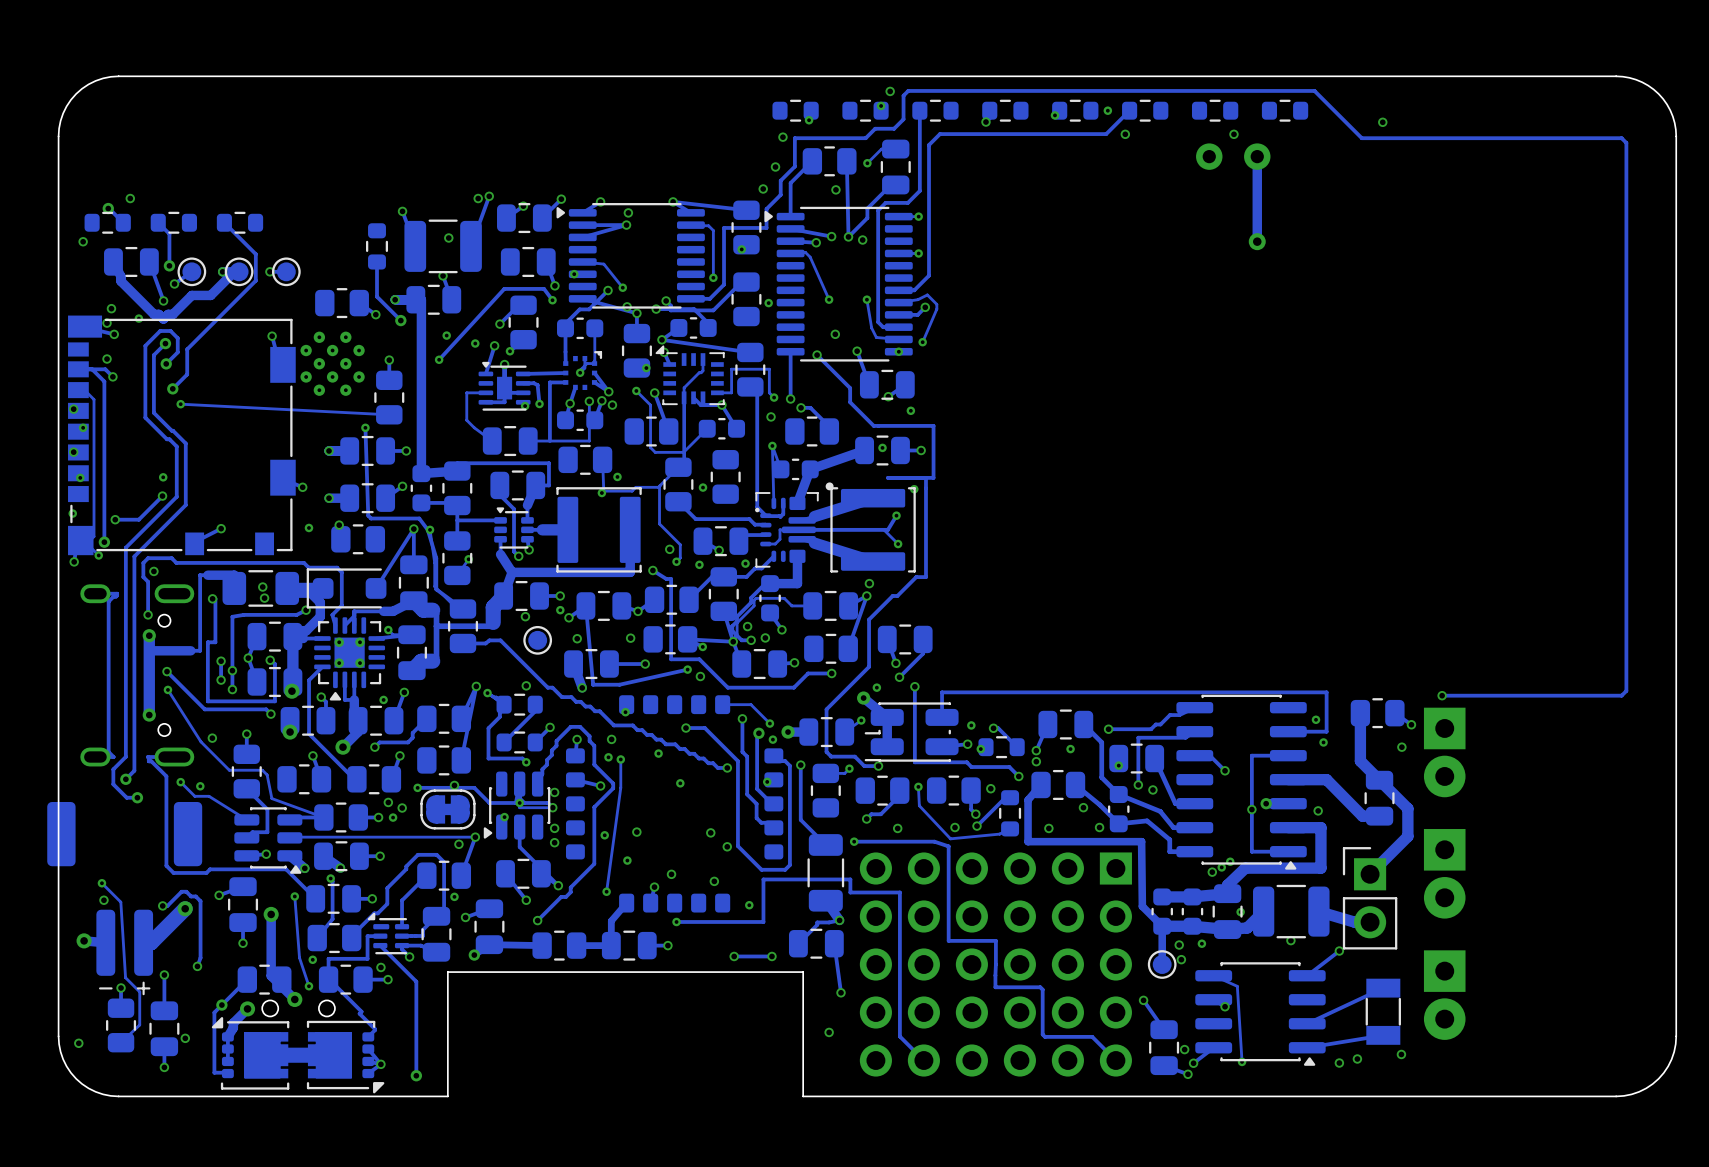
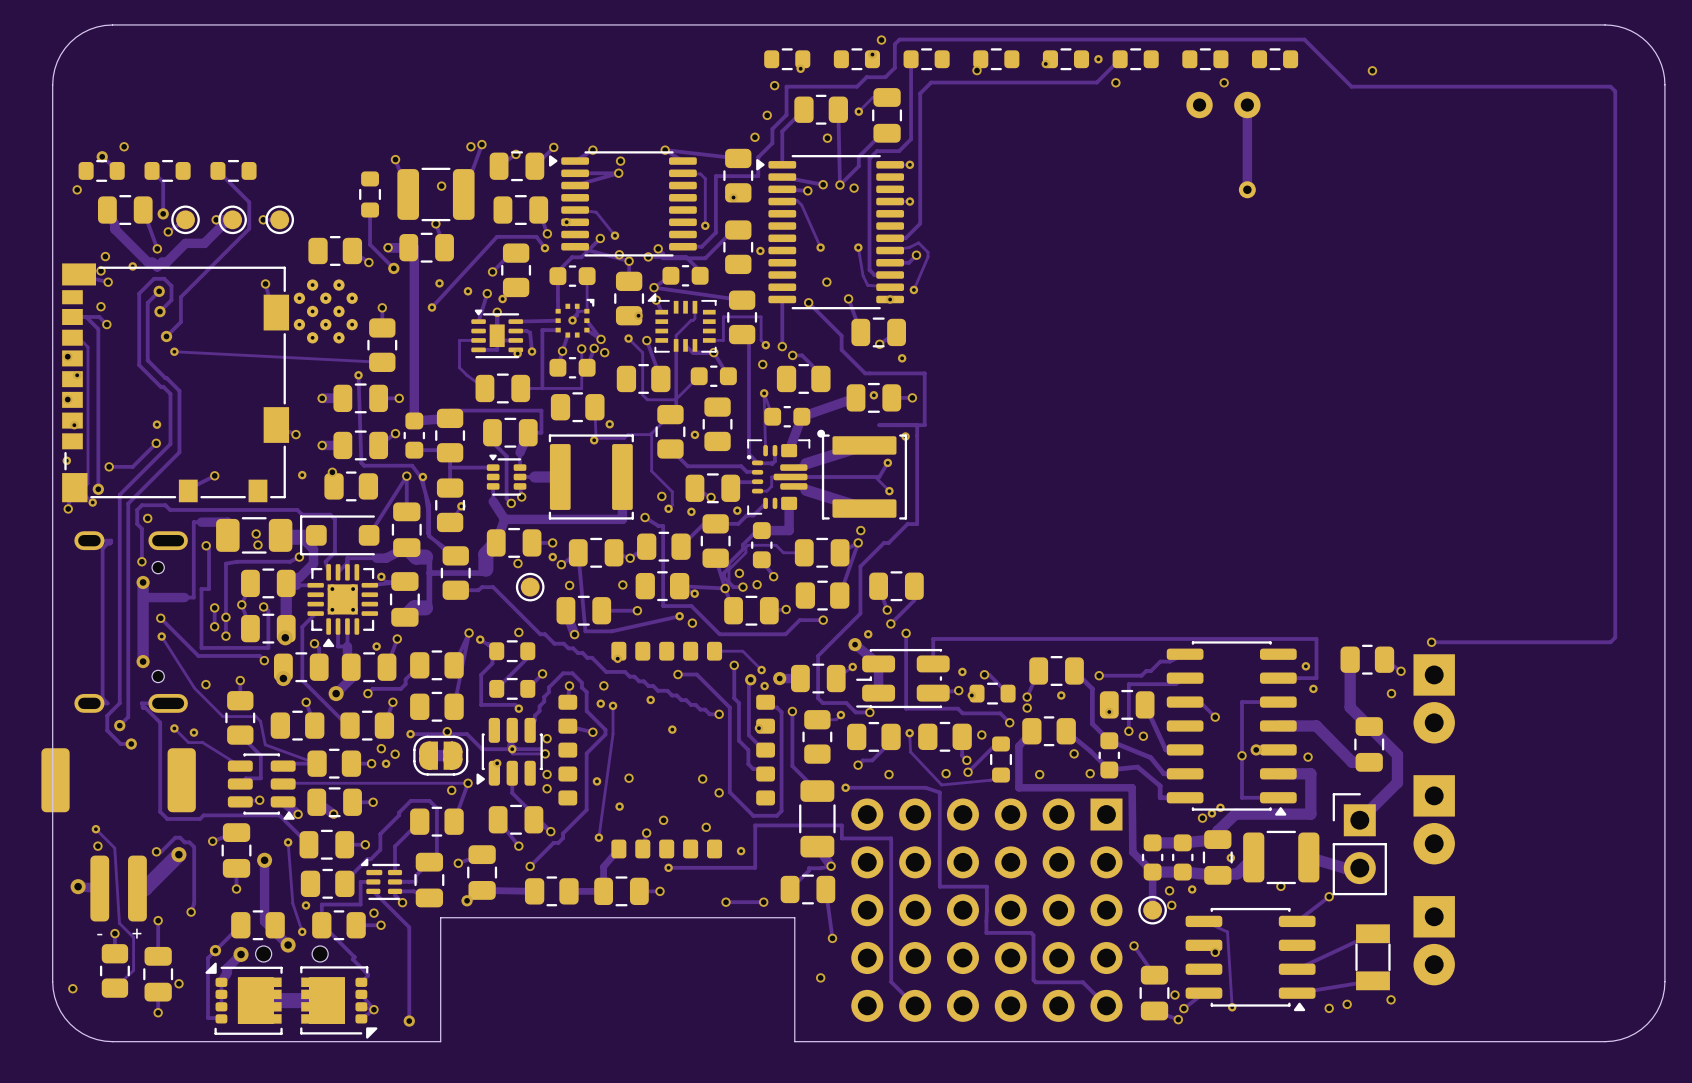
track: (330, 878) (332, 881) (332, 919) (317, 938) -> none
via: (330, 878) -> none
via: (454, 896) -> none

